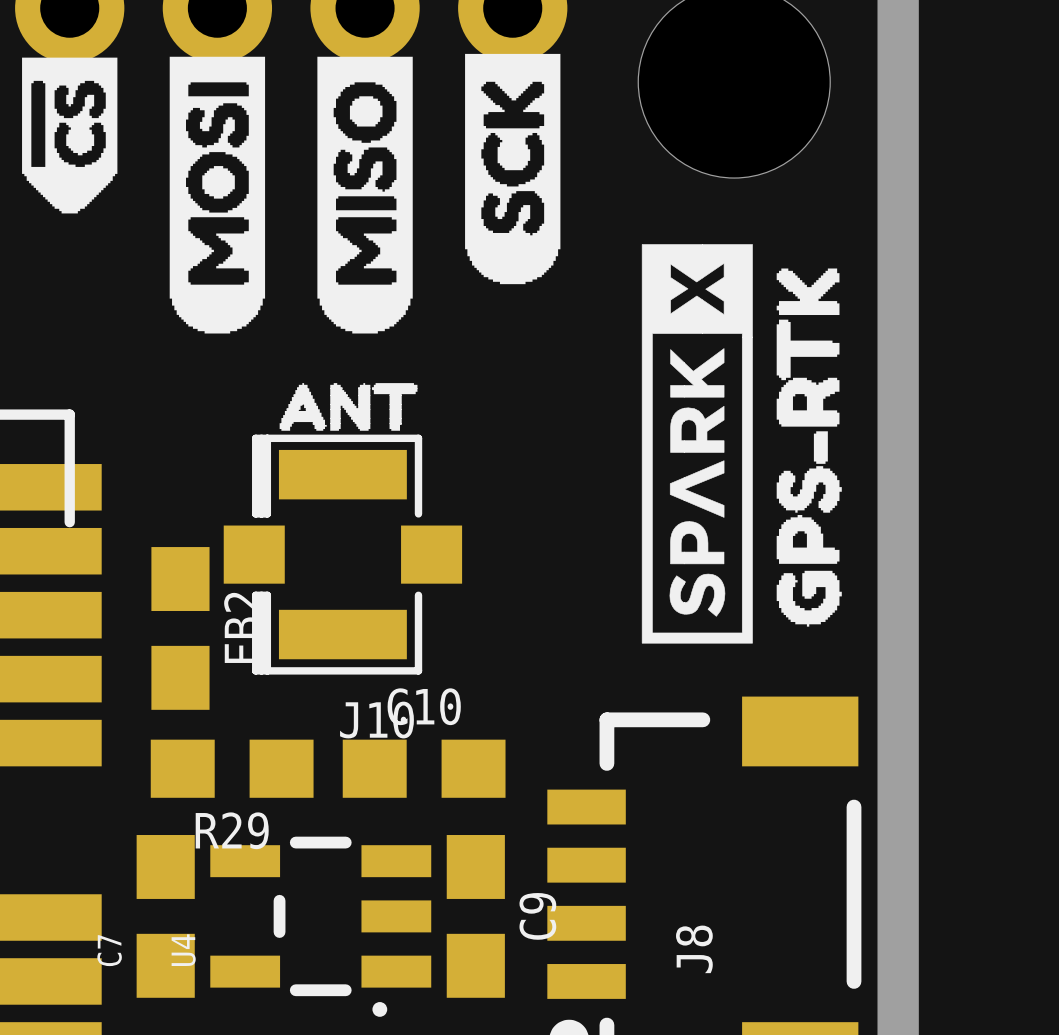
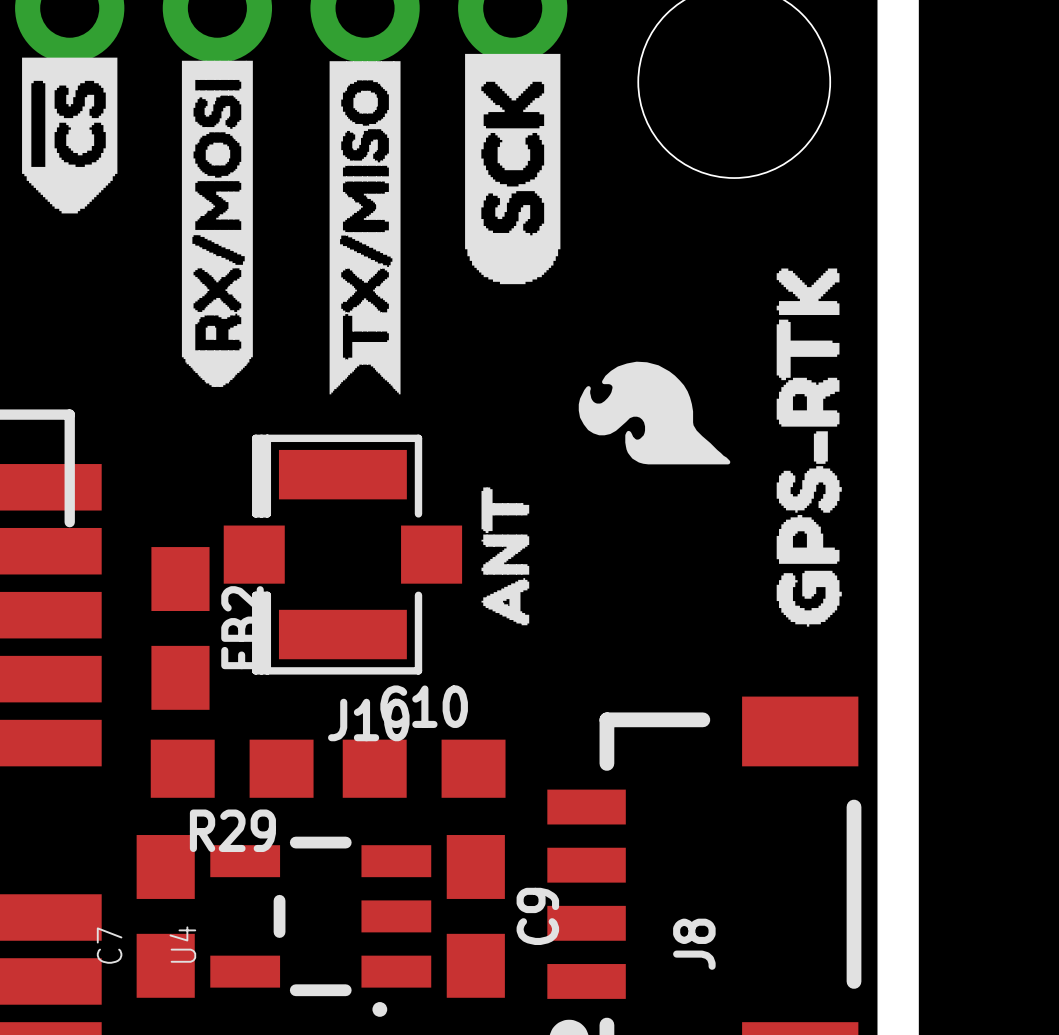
drawing shape: [169, 56, 266, 334] -> [181, 60, 253, 387]
drawing shape: [317, 56, 413, 334] -> [329, 61, 401, 395]
drawing shape: [641, 244, 753, 644] -> [578, 361, 731, 465]
drawing: [279, 383, 418, 431] -> none
drawing: none -> [481, 487, 530, 626]

